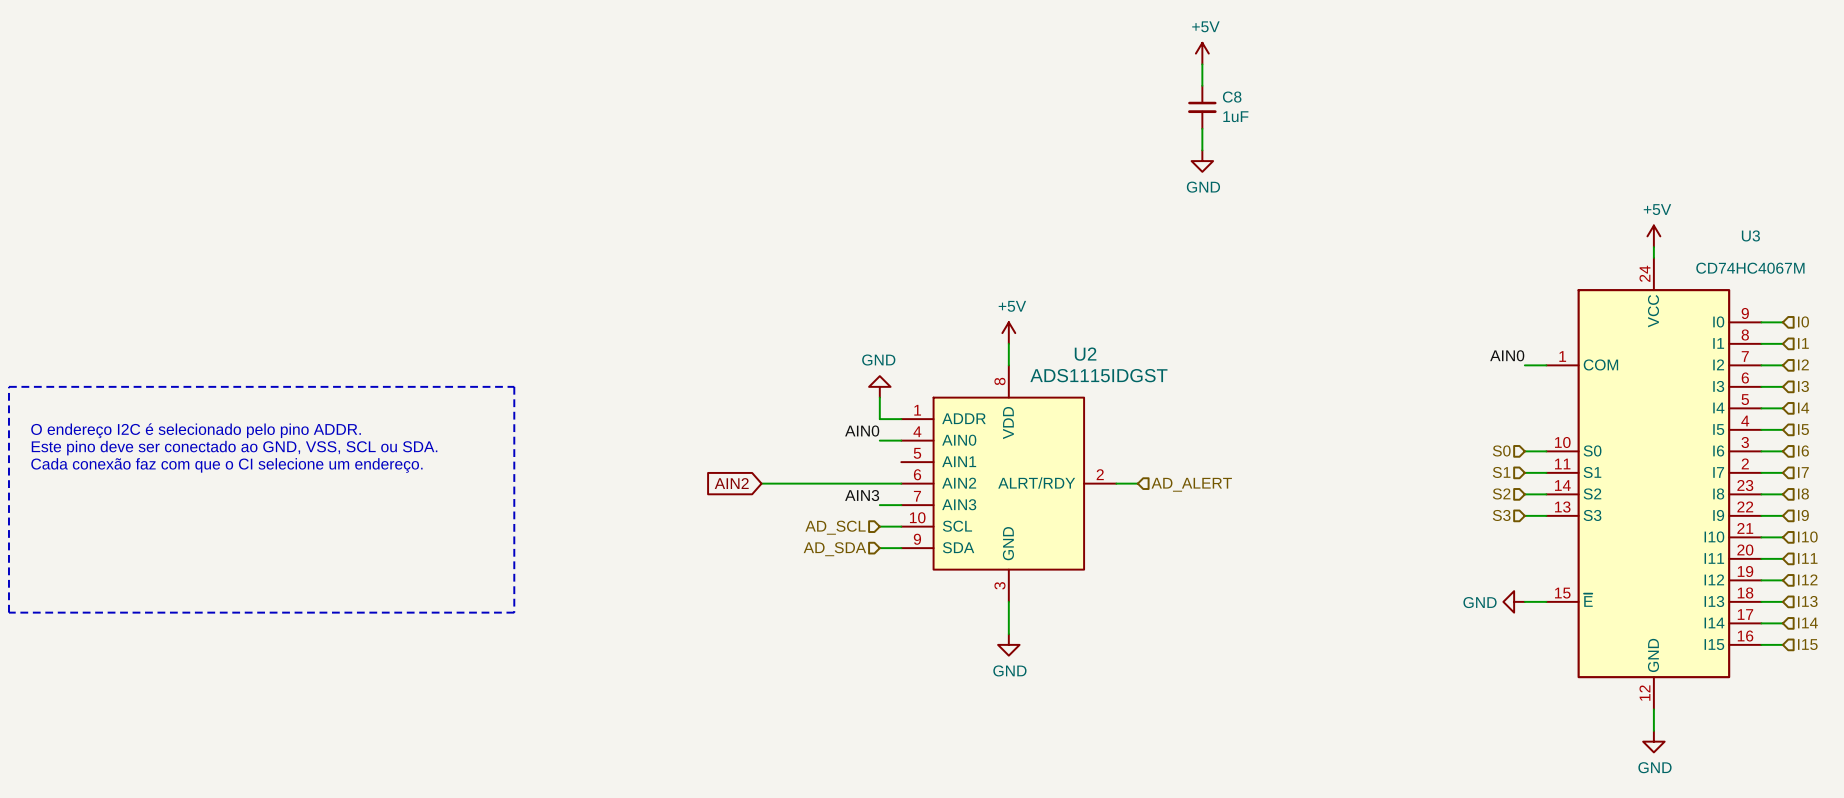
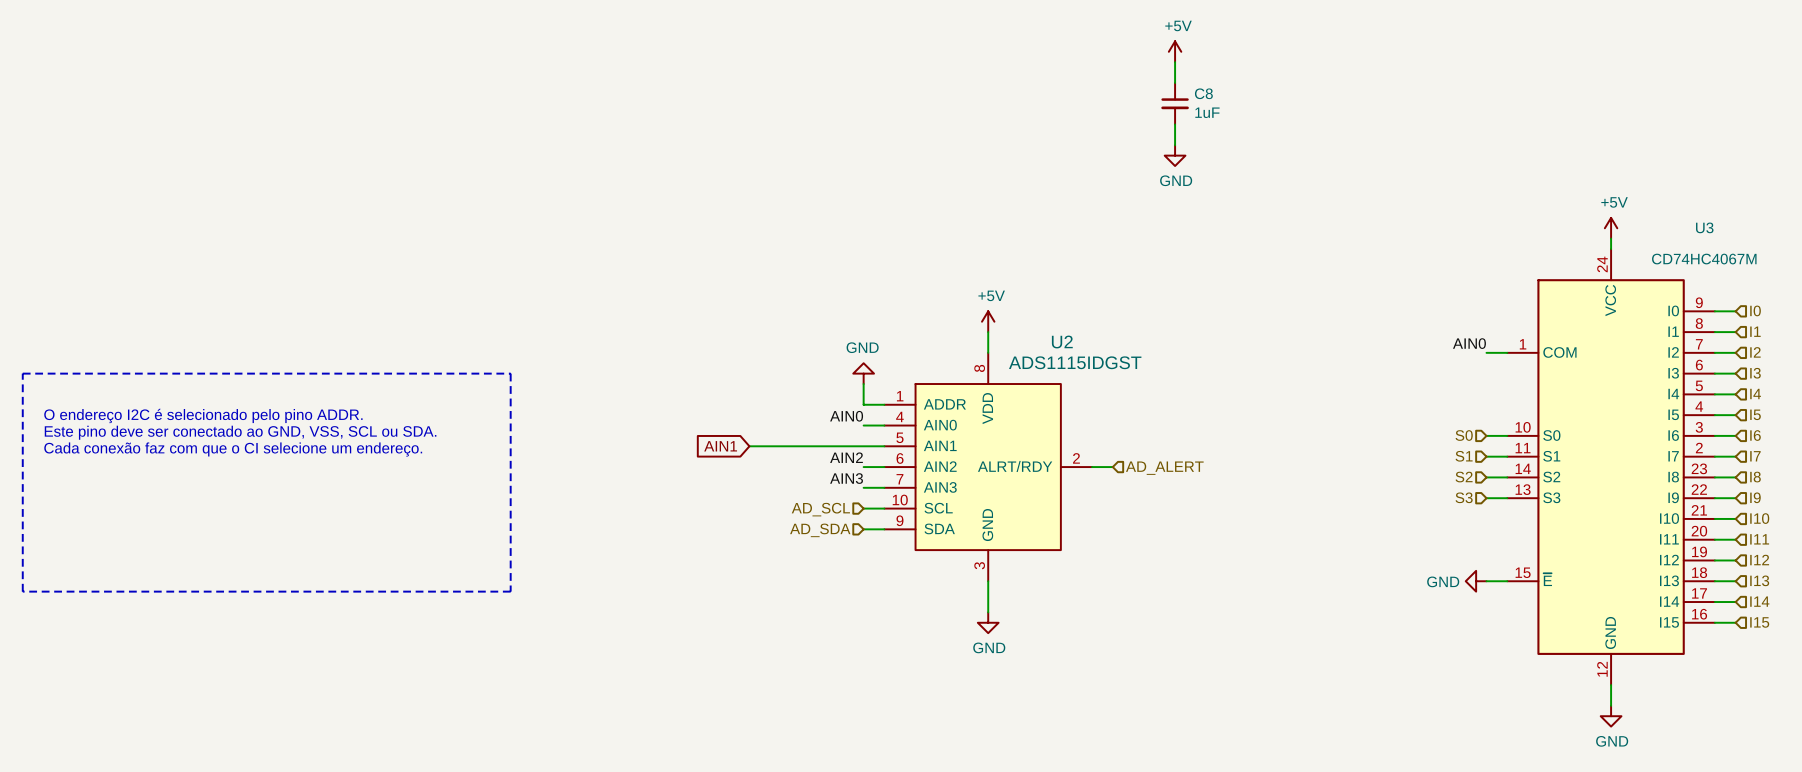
wire: none -> (749, 446) (884, 446)
label: none -> AIN2 (846, 457)
global label: AIN2 (731, 483) -> AIN1 (720, 446)
wire: (761, 483) (879, 483) -> none

